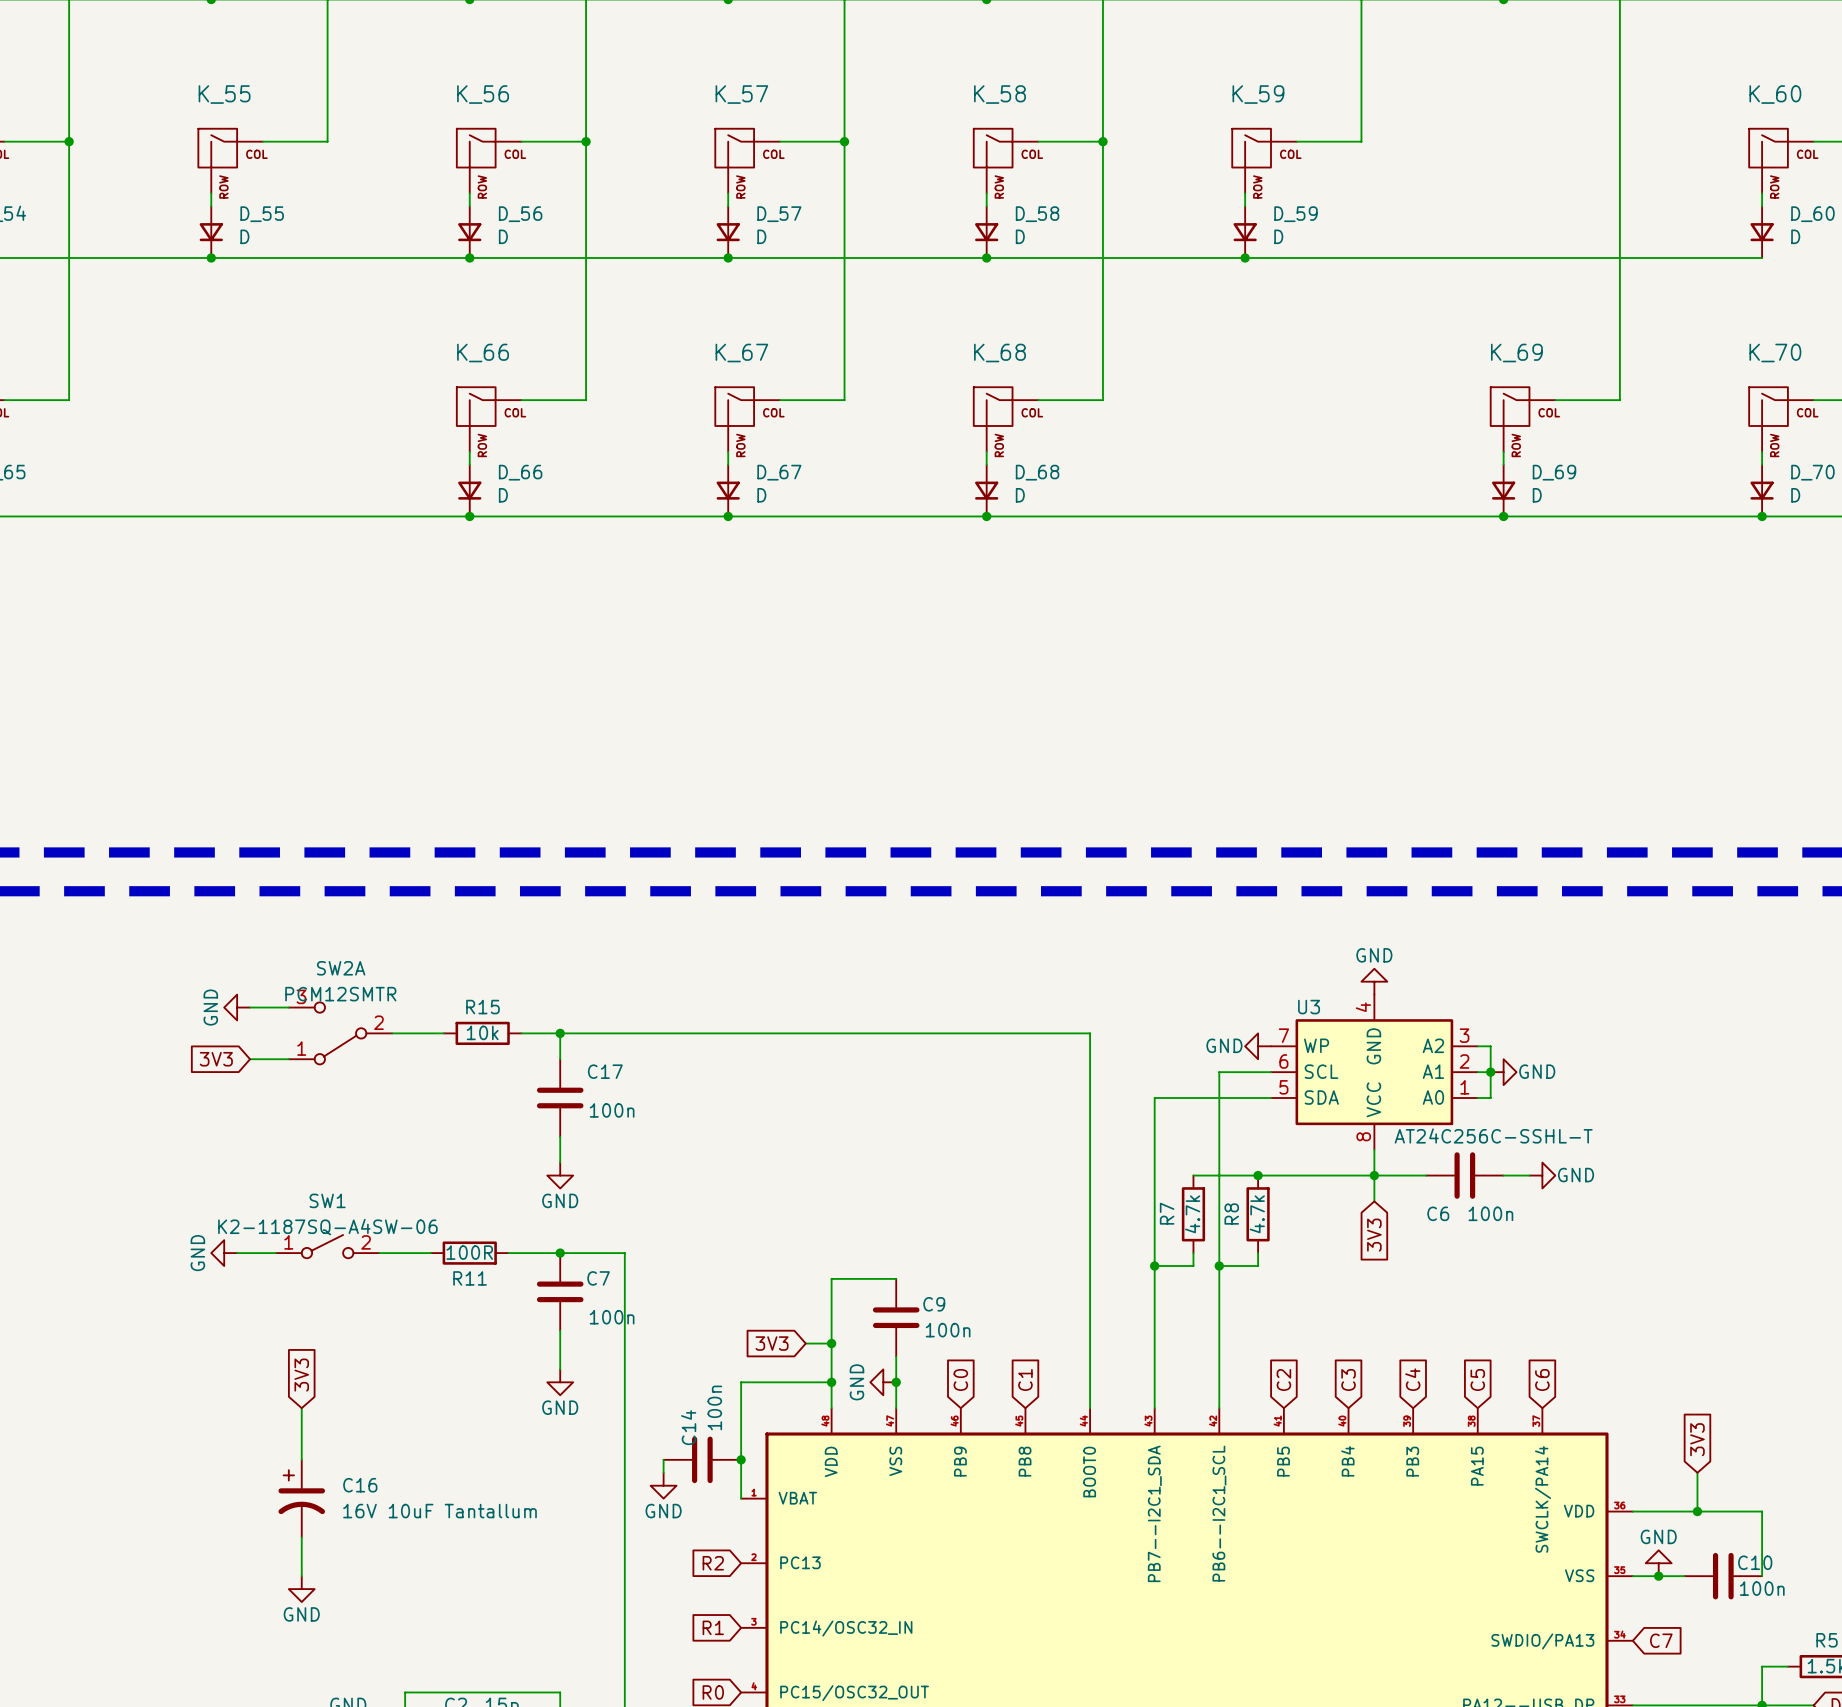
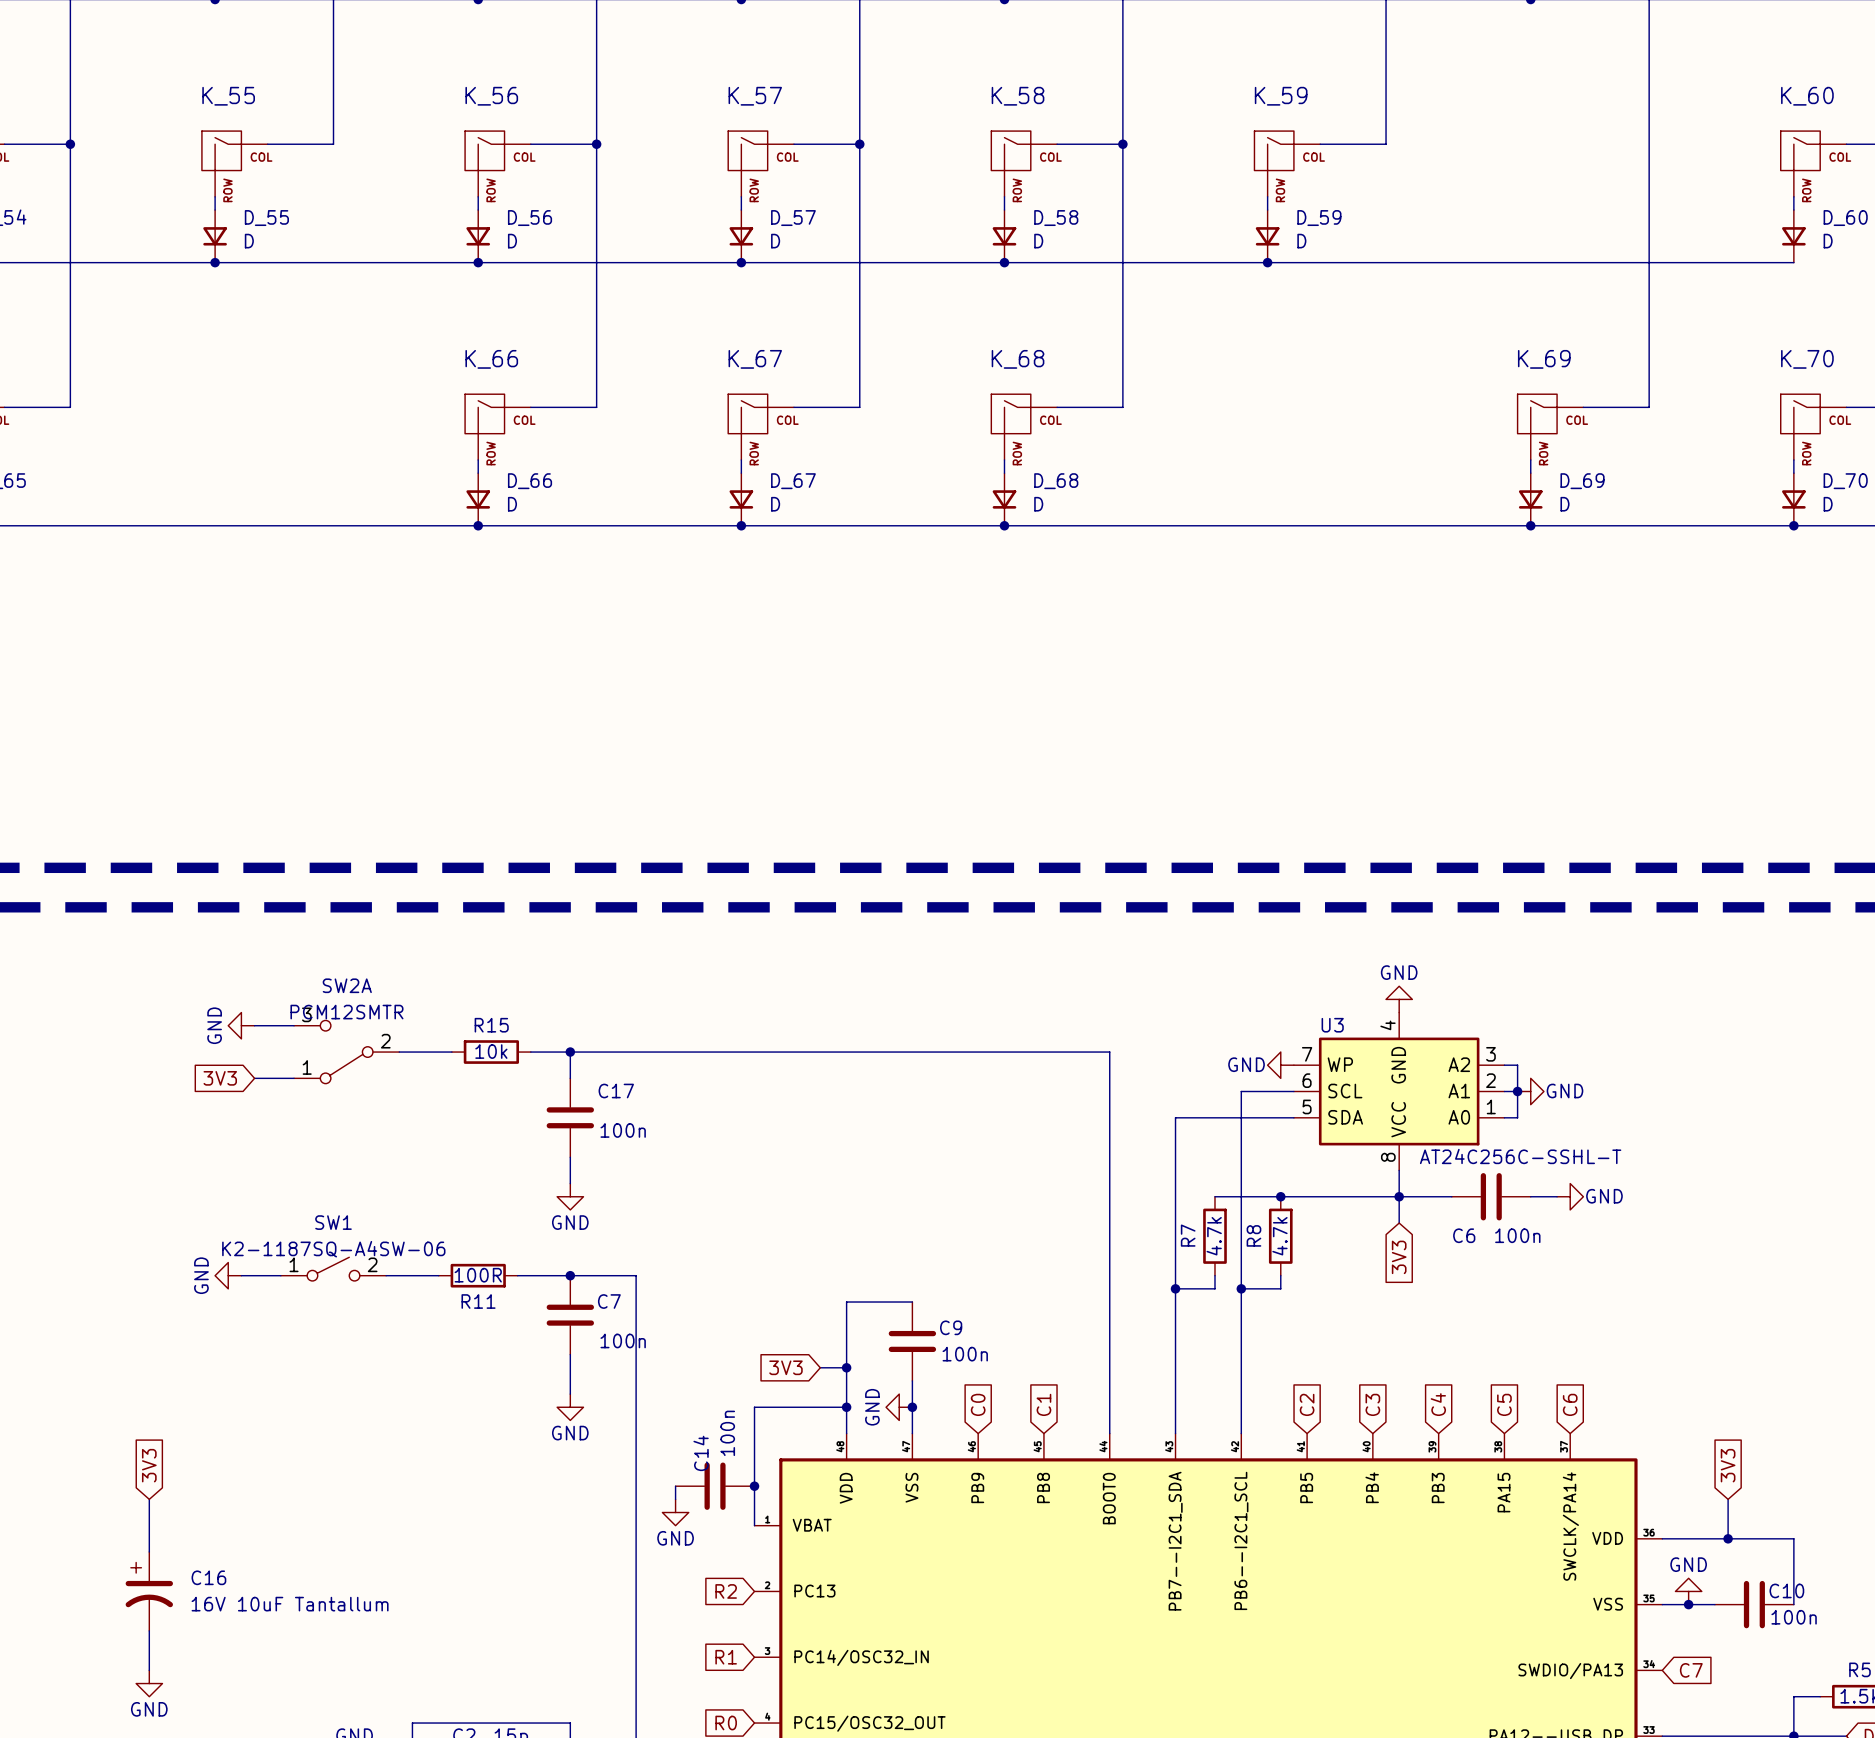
global label position: 3V3 (301, 1375) -> 3V3 (149, 1465)
wire: (301, 1408) (301, 1459) -> (149, 1499) (149, 1551)
C16 position: (301, 1498) -> (149, 1591)
wire: (301, 1537) (301, 1576) -> (149, 1630) (149, 1670)
power symbol position: GND (301, 1589) -> GND (149, 1683)

